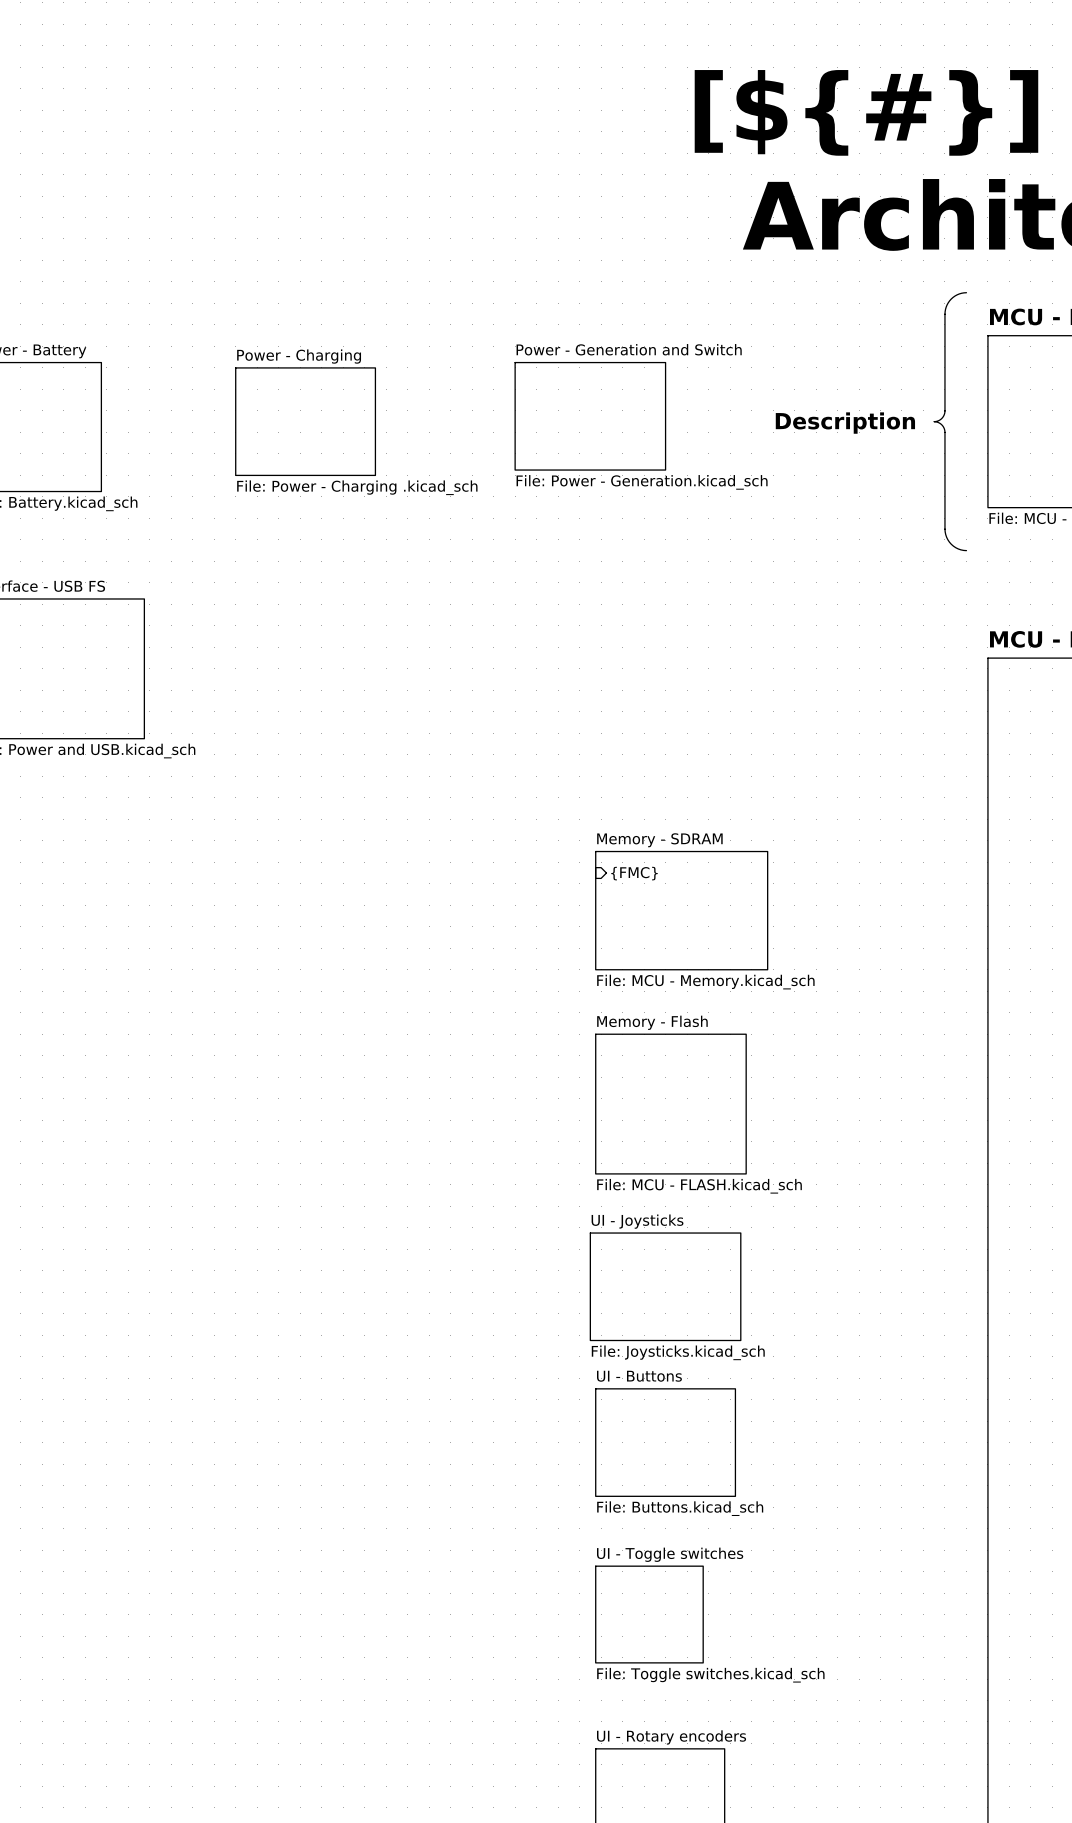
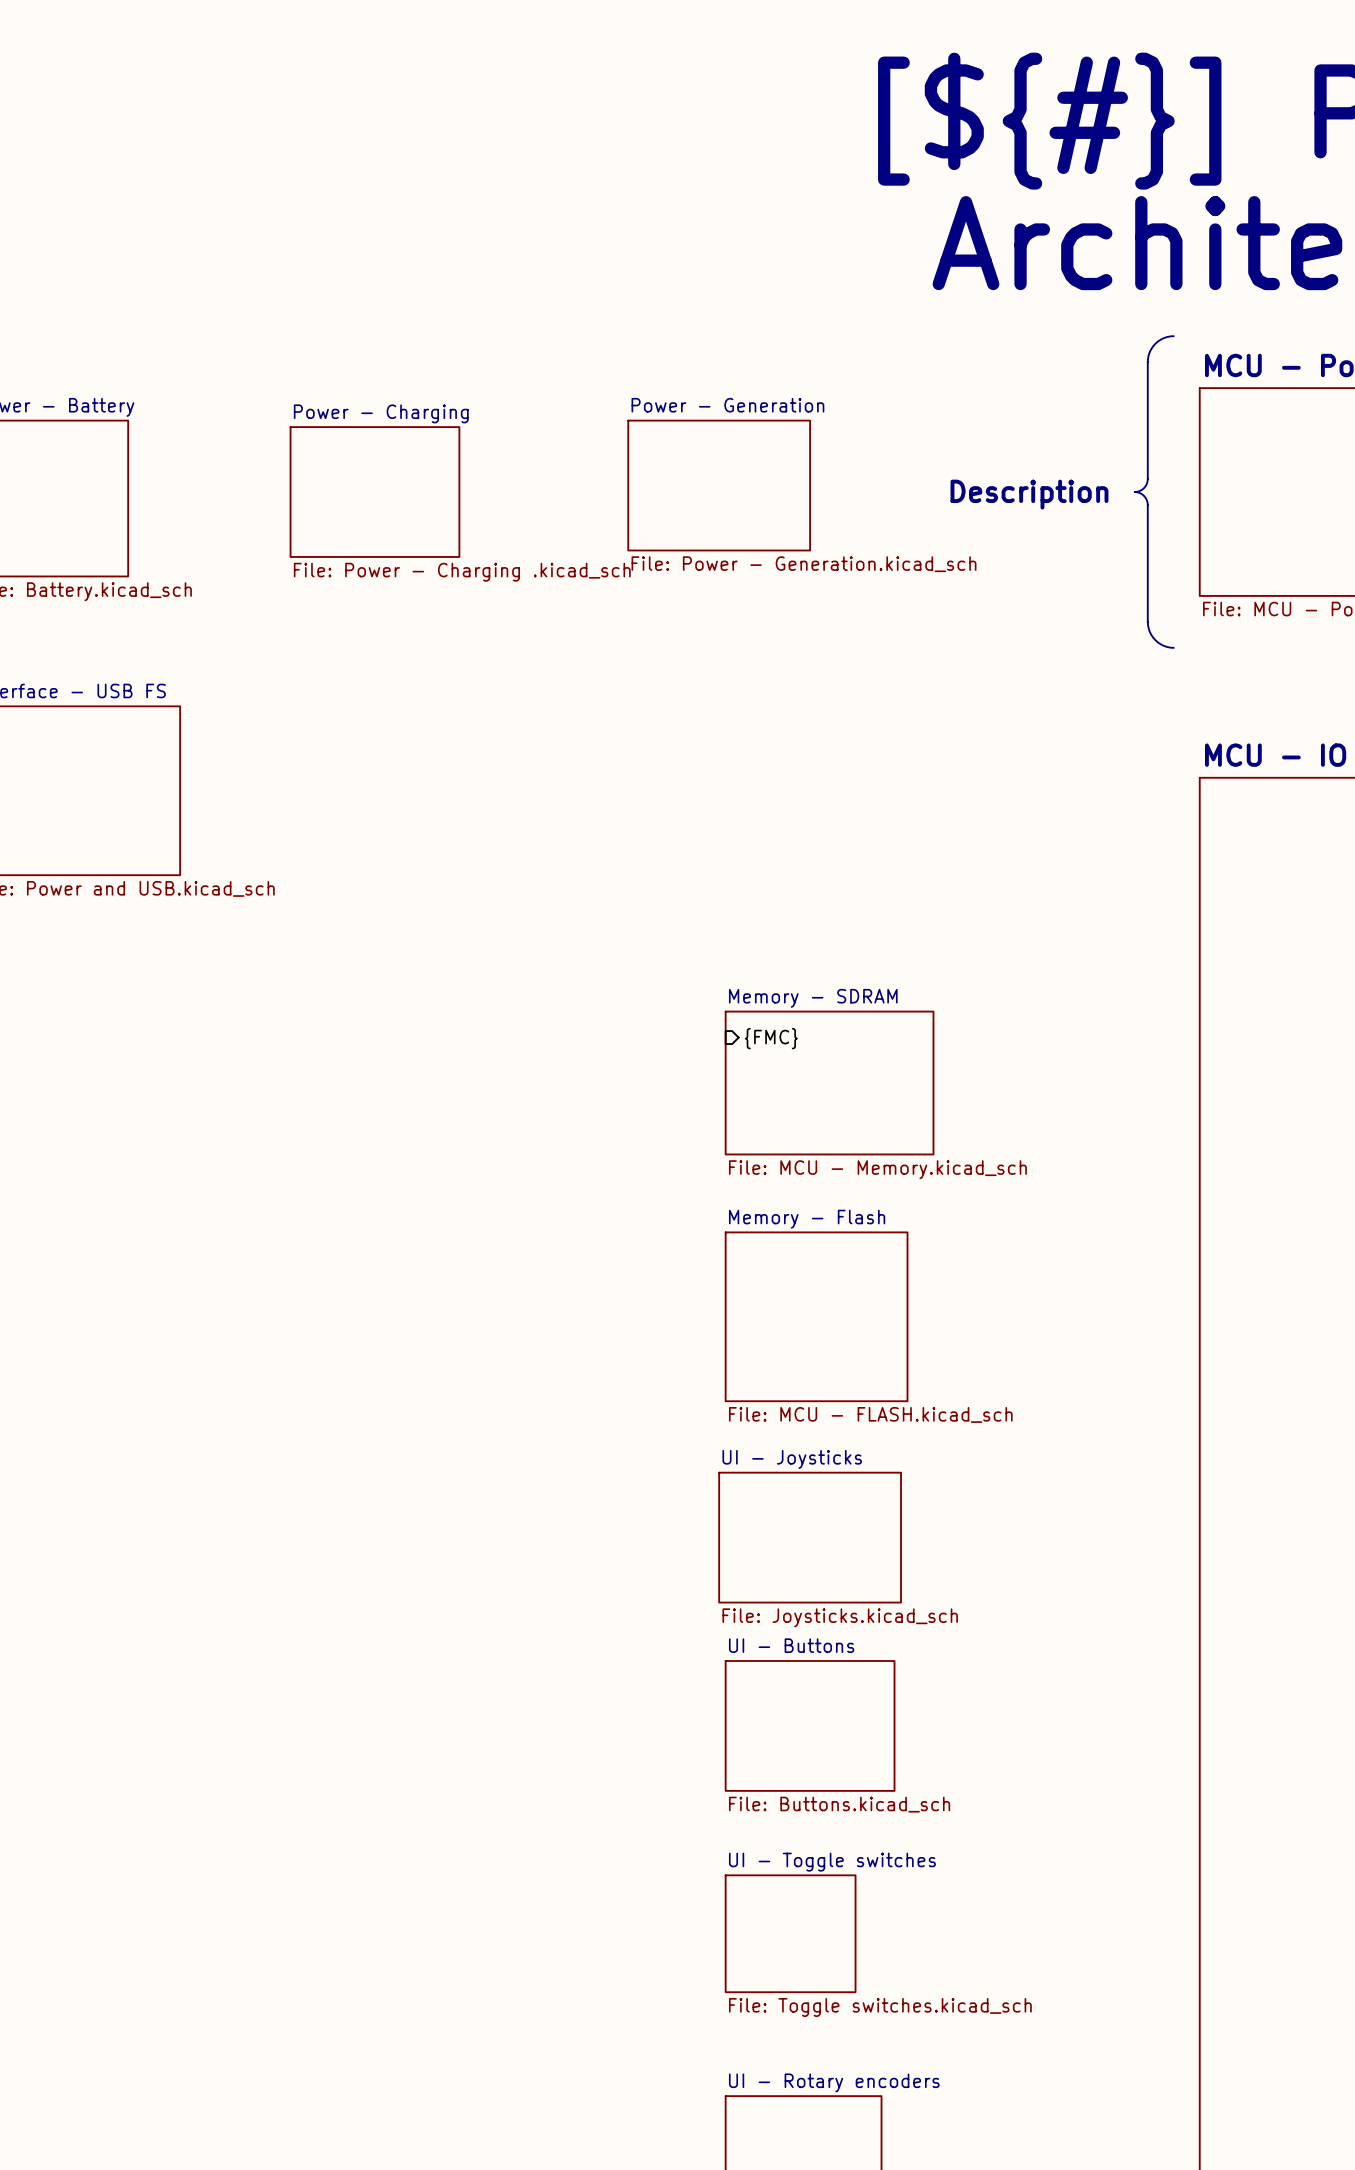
sheet Power - Generation and Switch name: Power - Generation and Switch (629, 349) -> Power - Generation (727, 405)

